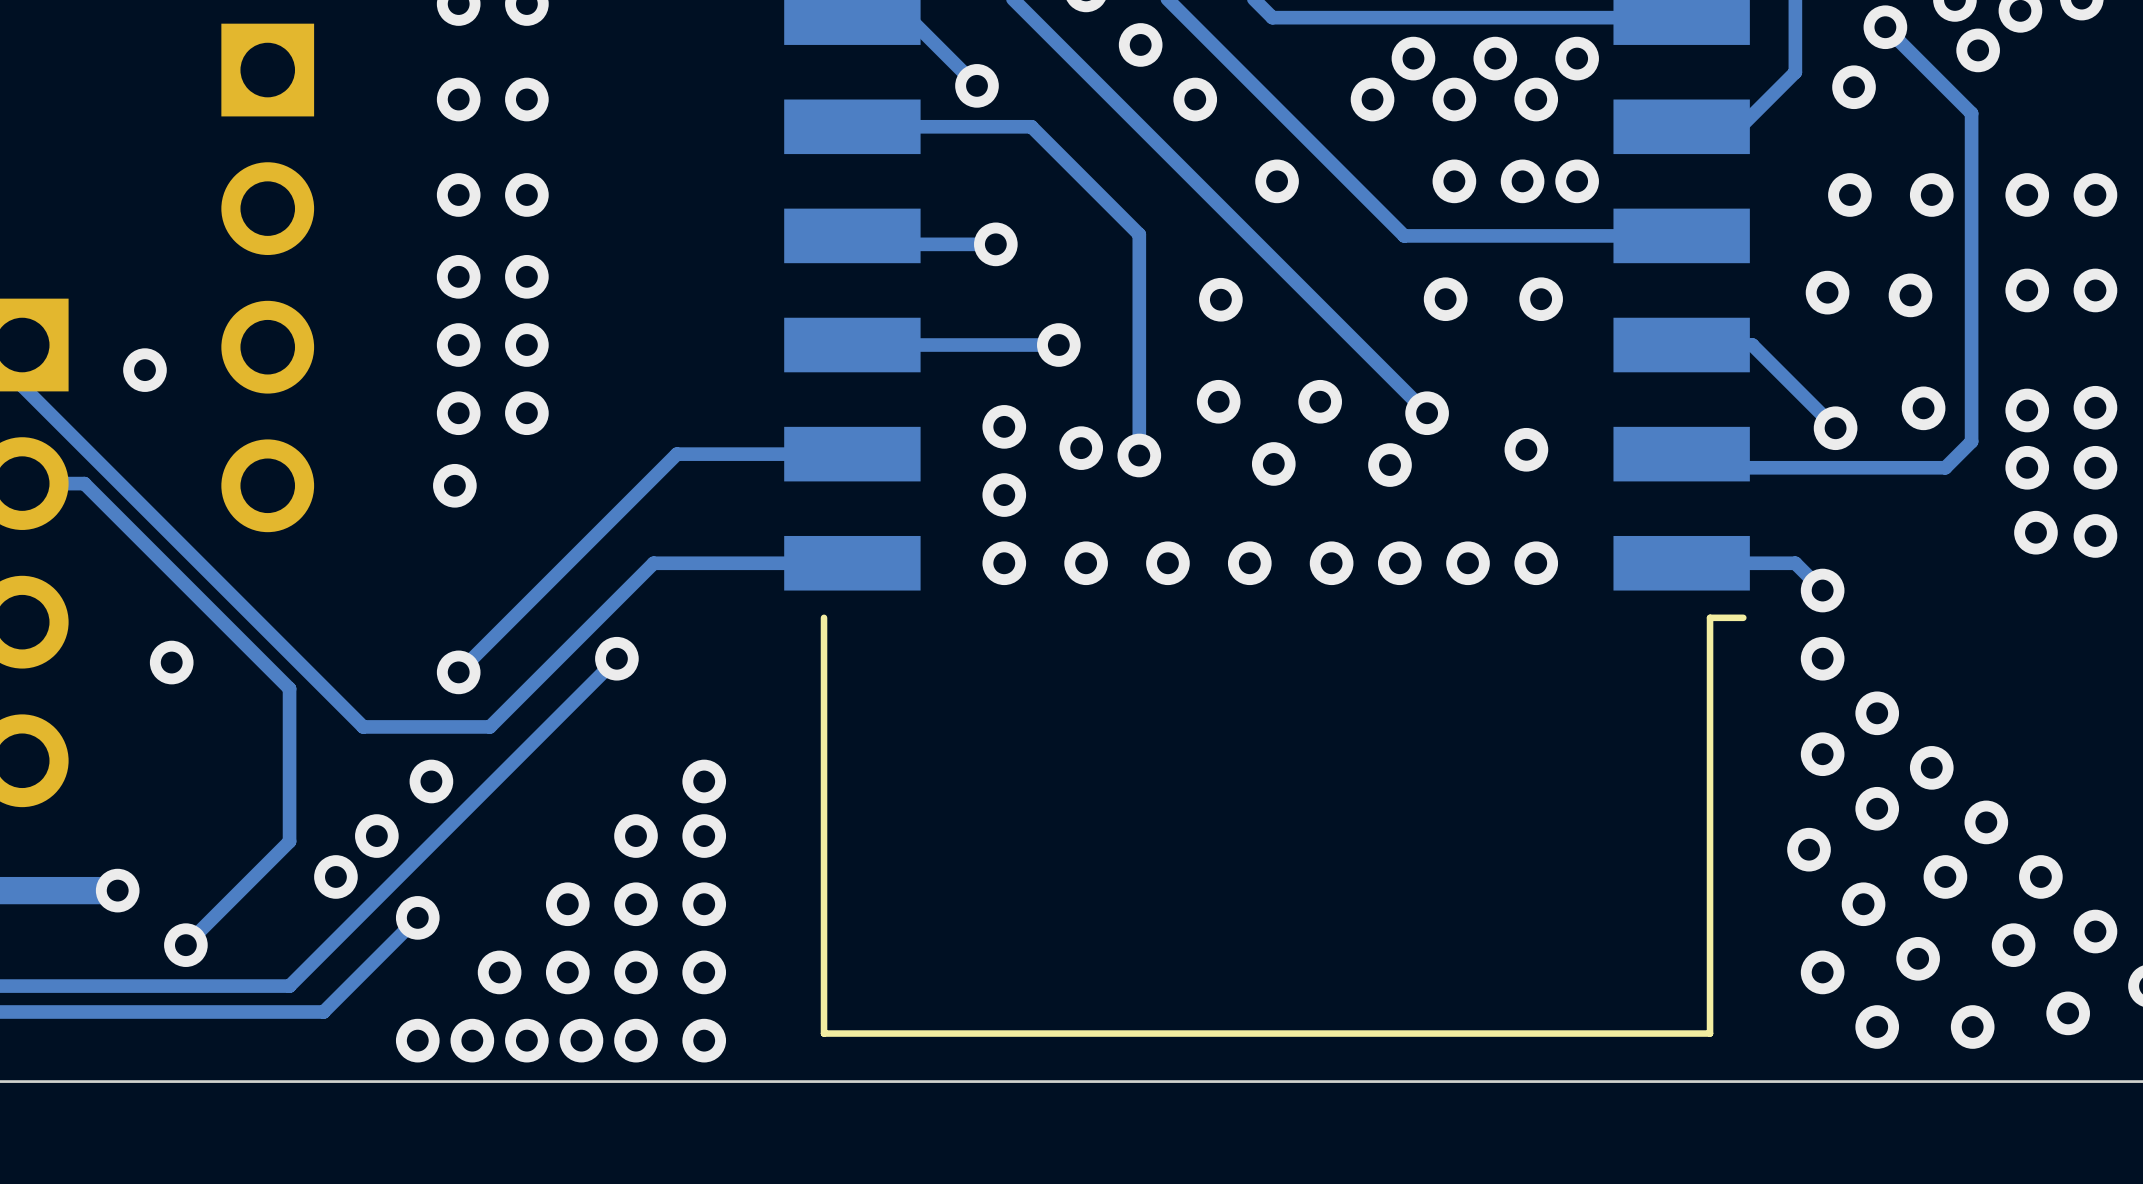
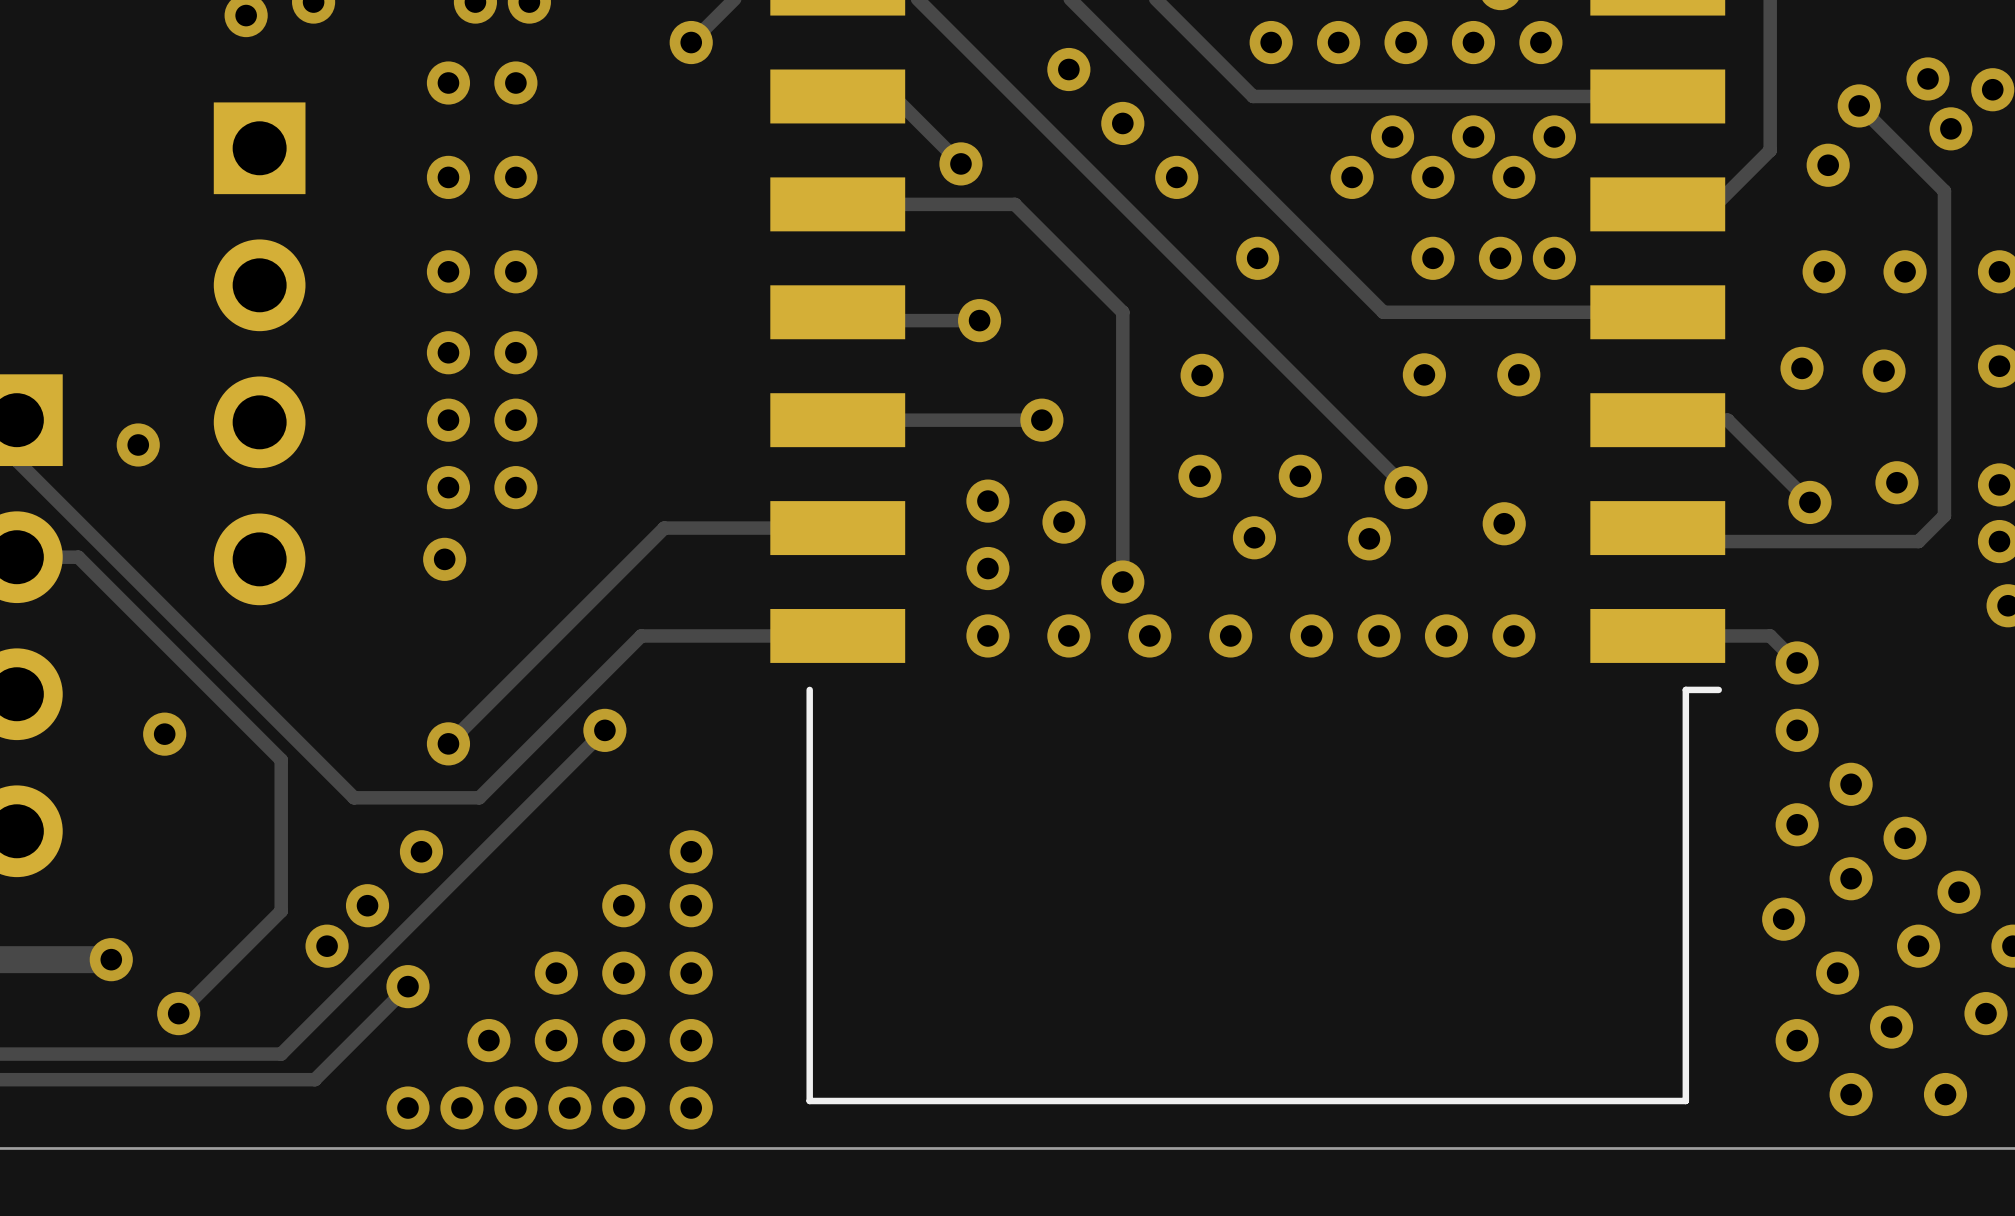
track: (1139, 234) (1139, 455) -> (1121, 310) (1122, 582)
via position: (1139, 455) -> (1122, 582)

